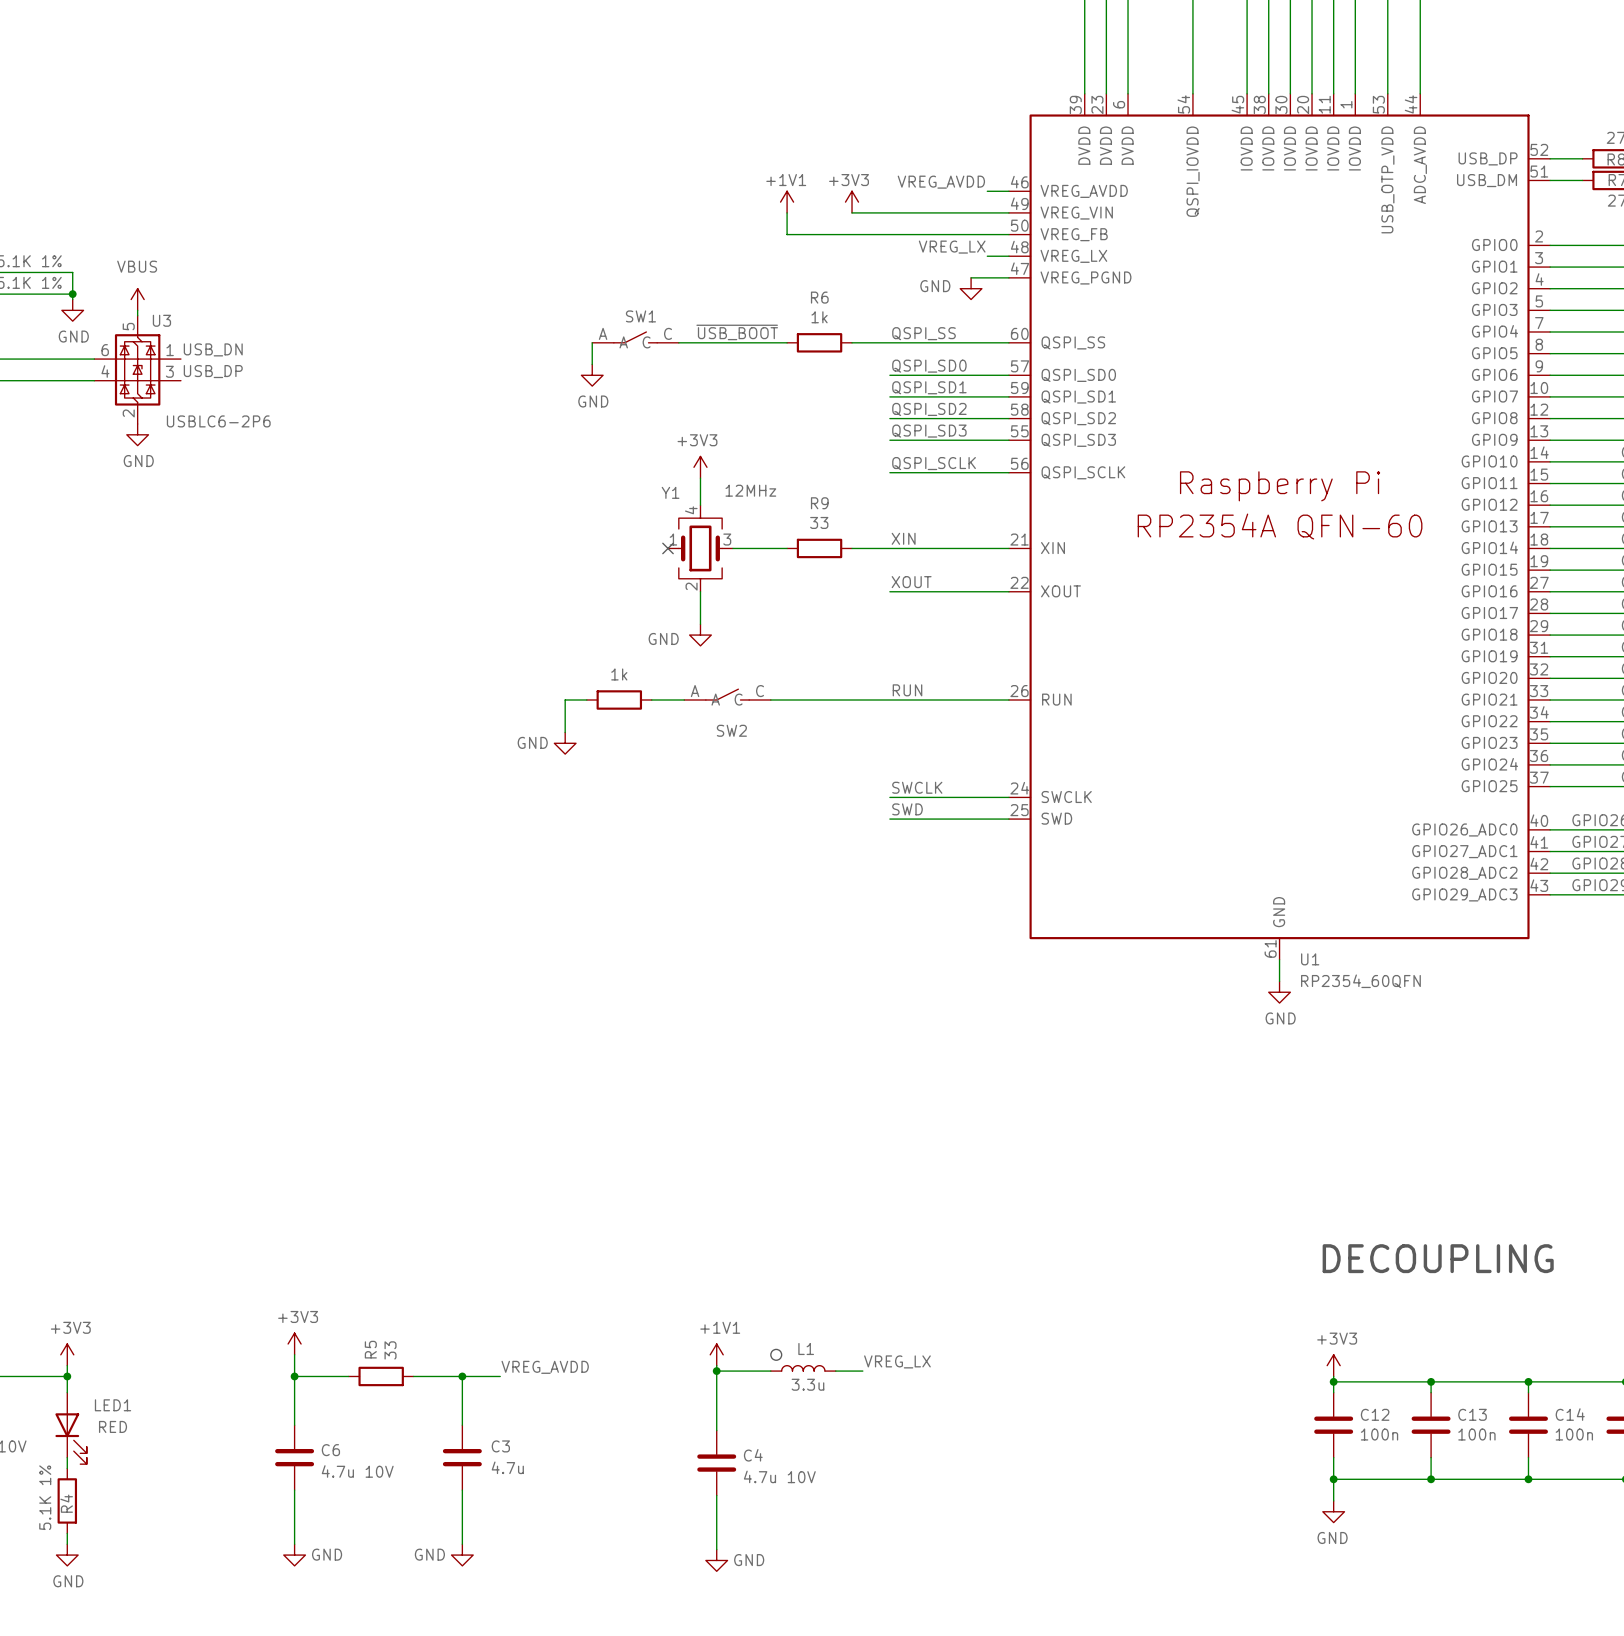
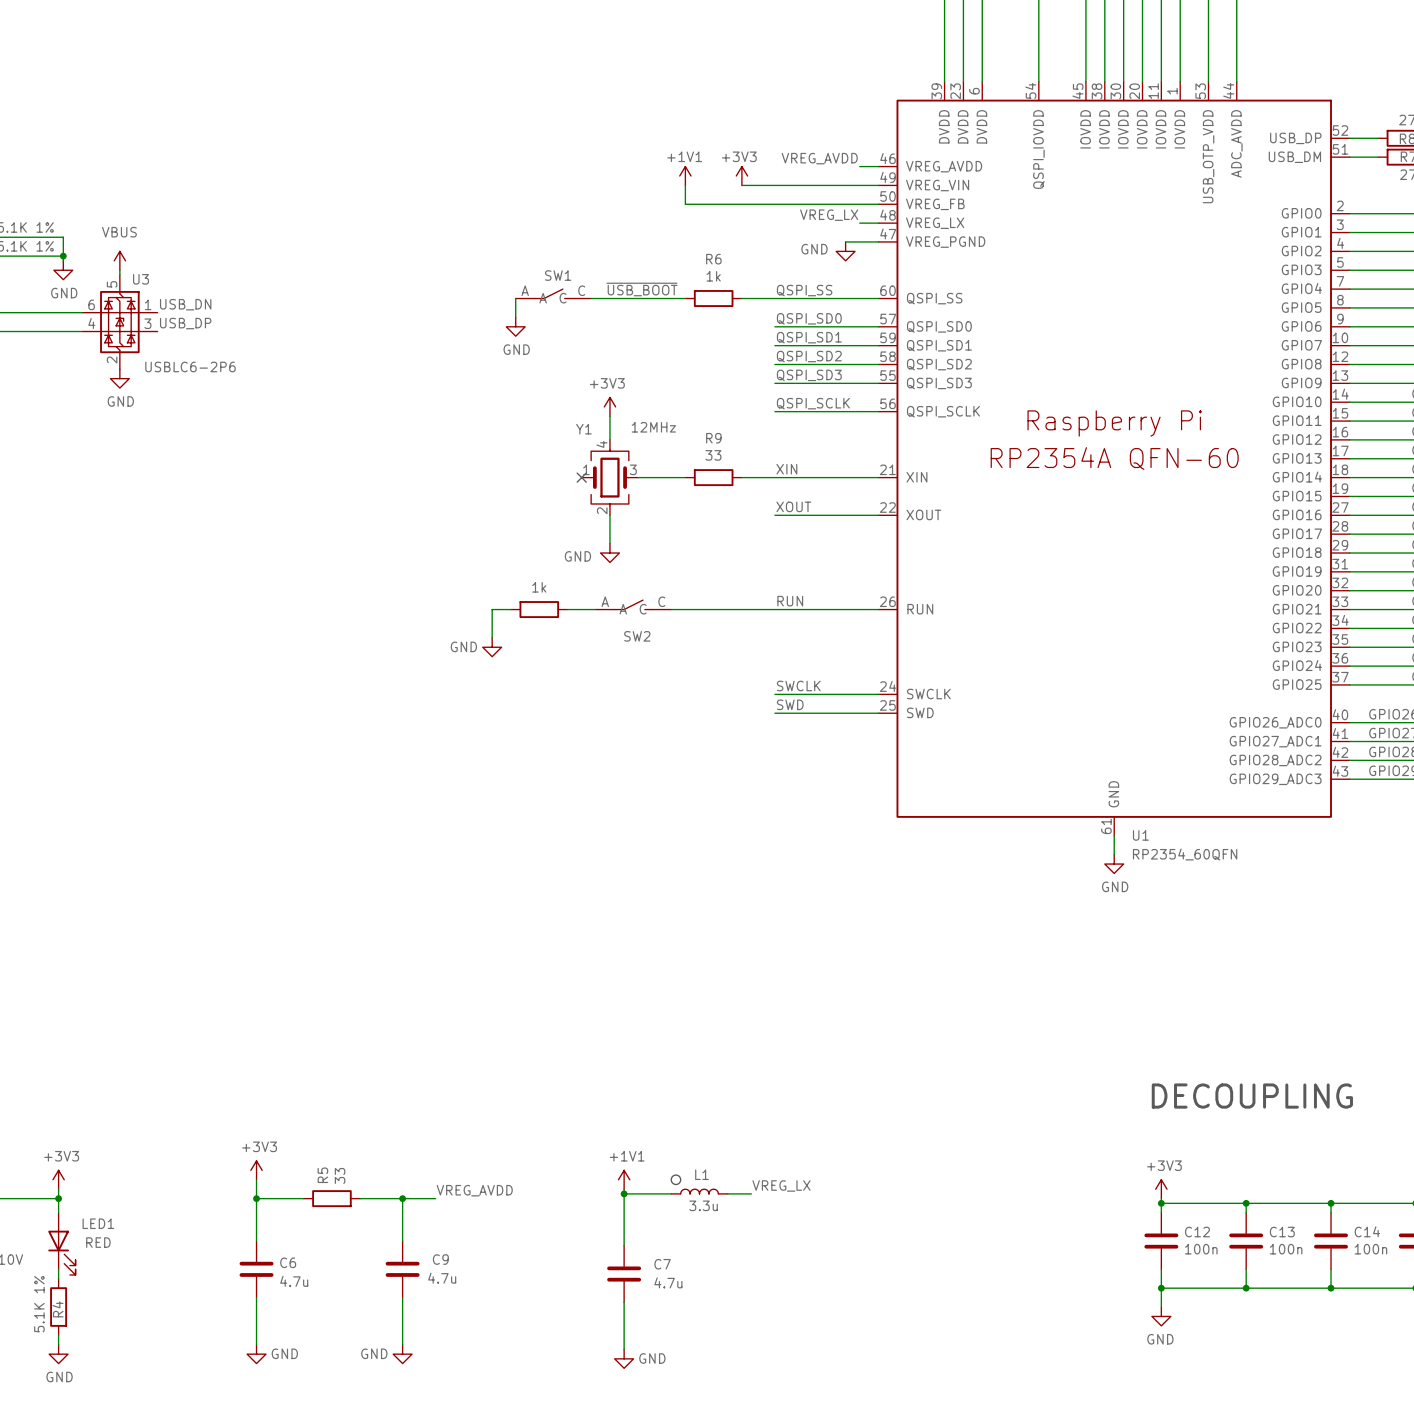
C3 name: C3 (500, 1446) -> C9 (440, 1259)
C4 name: C4 (753, 1455) -> C7 (662, 1264)
C6 value: 4.7u 10V (357, 1471) -> 4.7u (294, 1281)
C4 value: 4.7u 10V (779, 1476) -> 4.7u (668, 1282)

